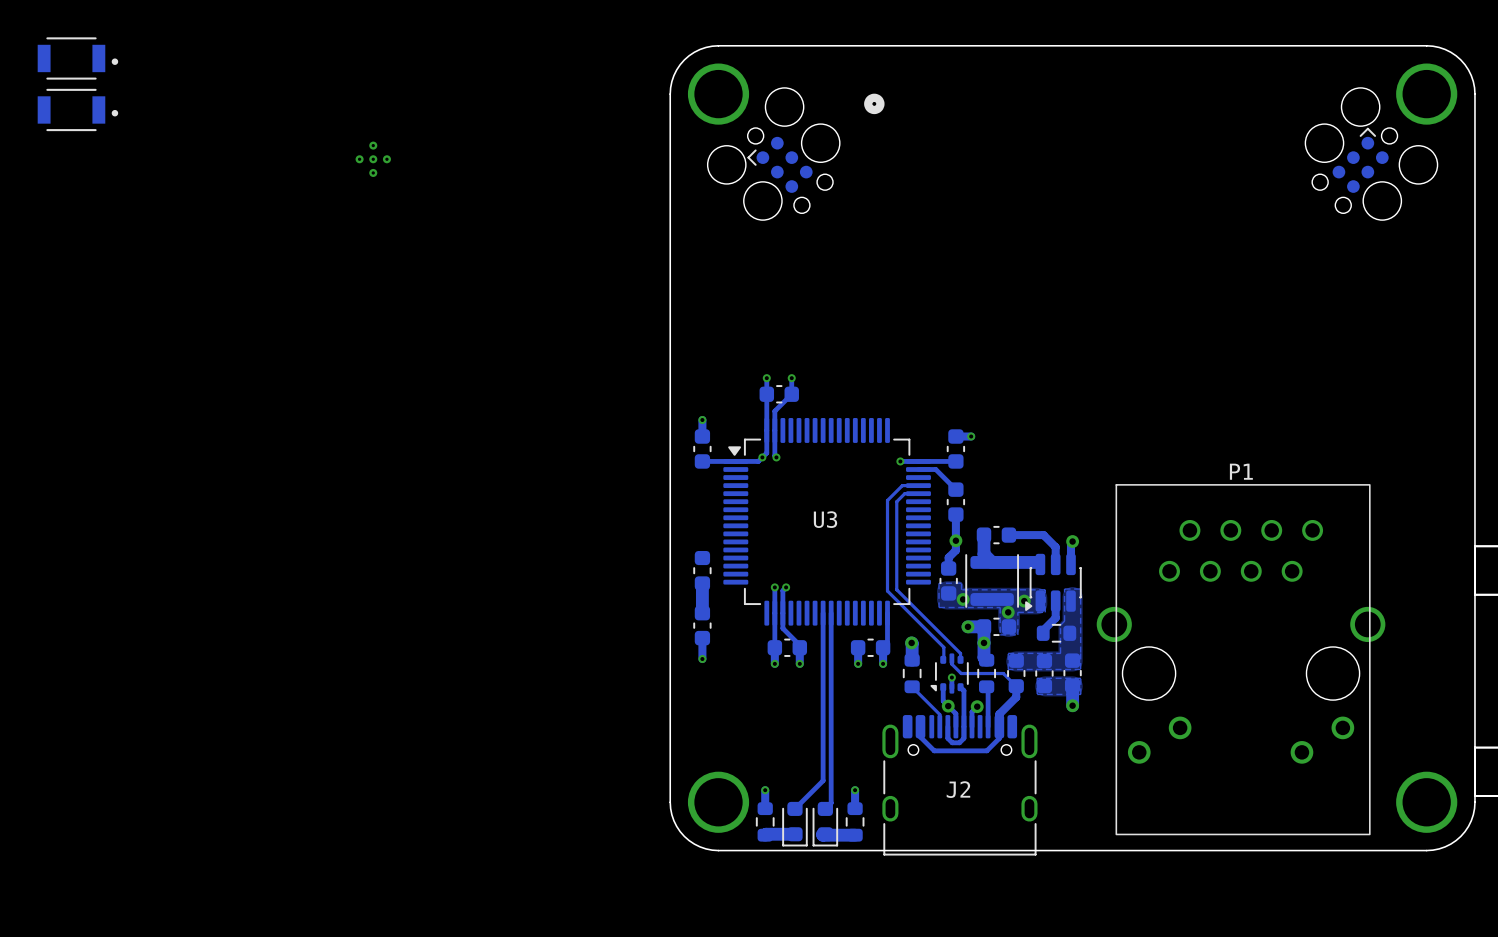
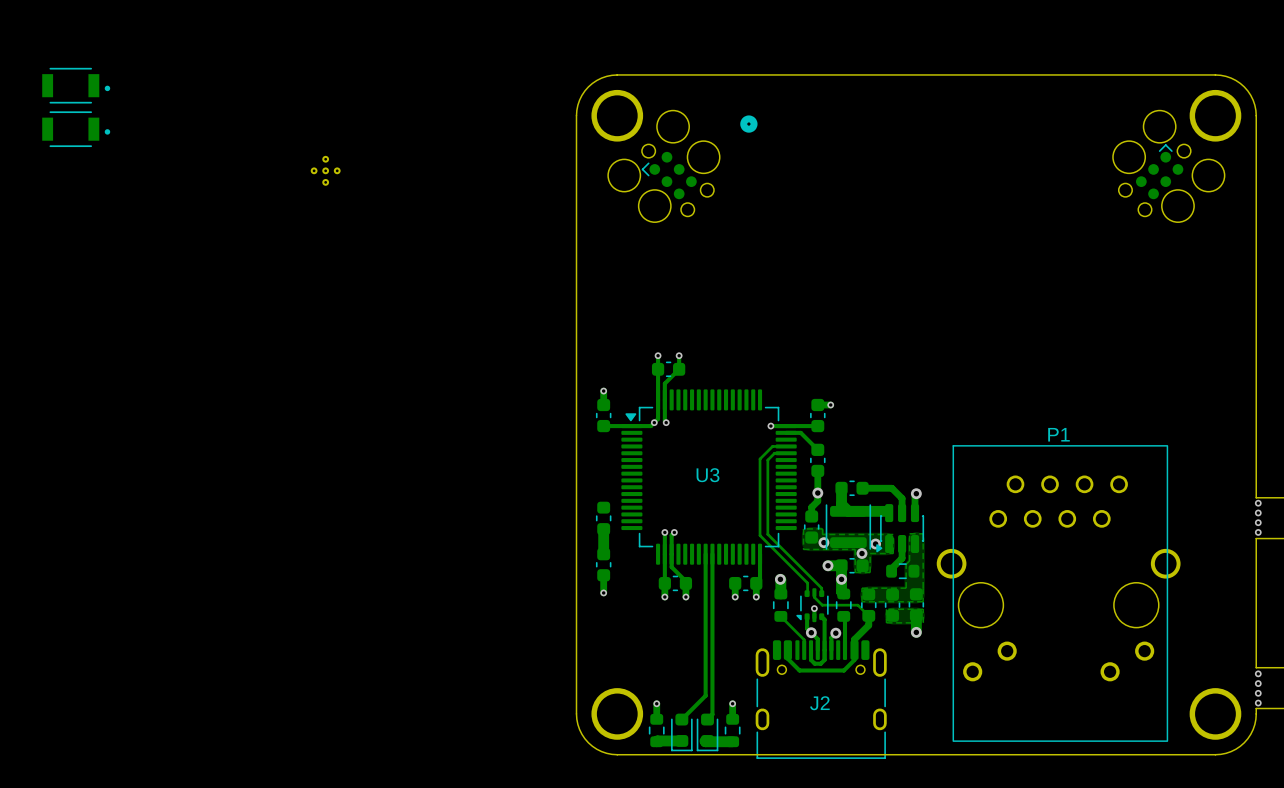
board edge: (1474, 546) (1474, 594) -> none
via: none -> (1258, 503)
via: none -> (1258, 512)
via: none -> (1258, 522)
via: none -> (1258, 532)
board edge: (1474, 747) (1474, 795) -> none
via: none -> (1258, 673)
via: none -> (1258, 683)
via: none -> (1258, 693)
via: none -> (1258, 703)

